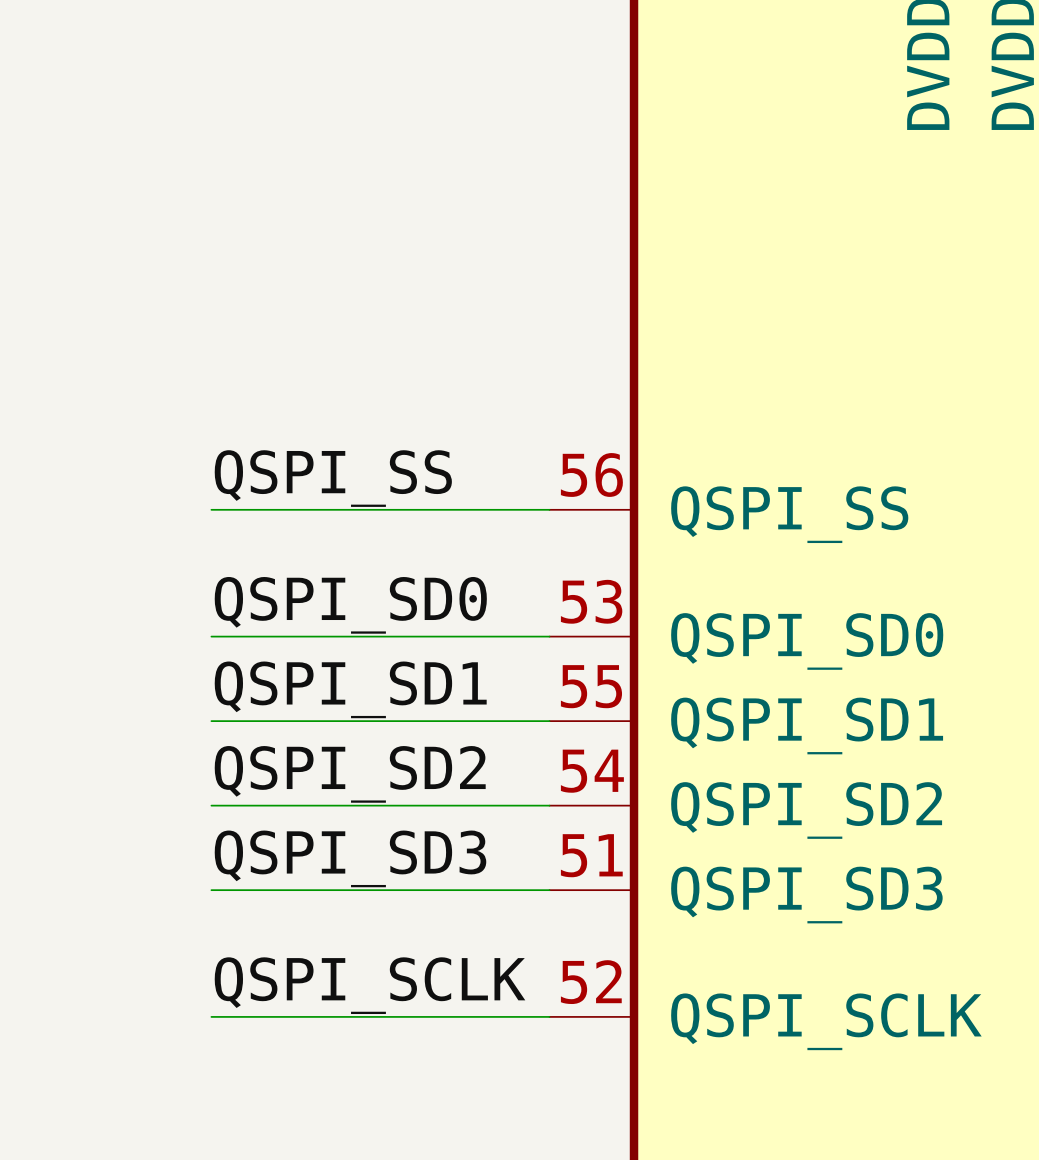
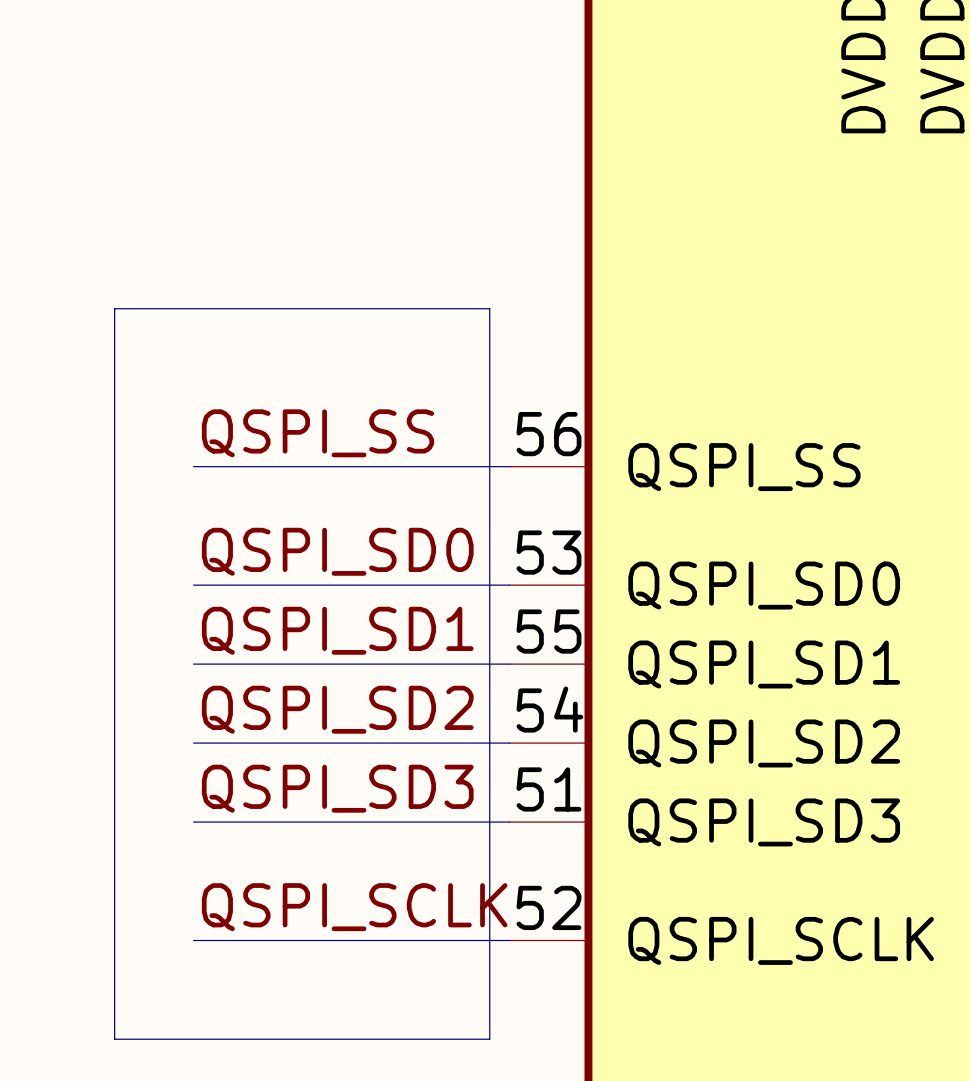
line: none -> (114, 308) (489, 308) (489, 1039) (114, 1039) (114, 308)

